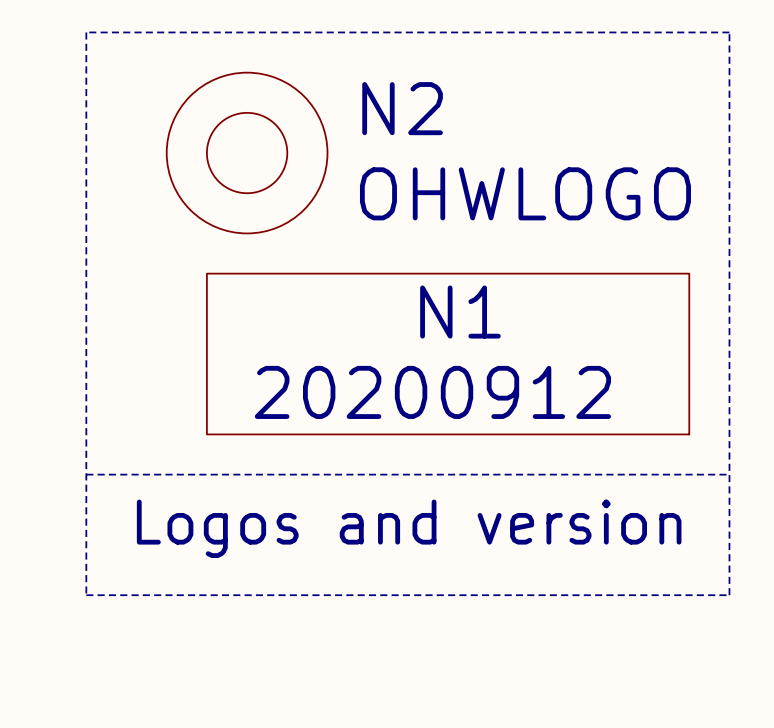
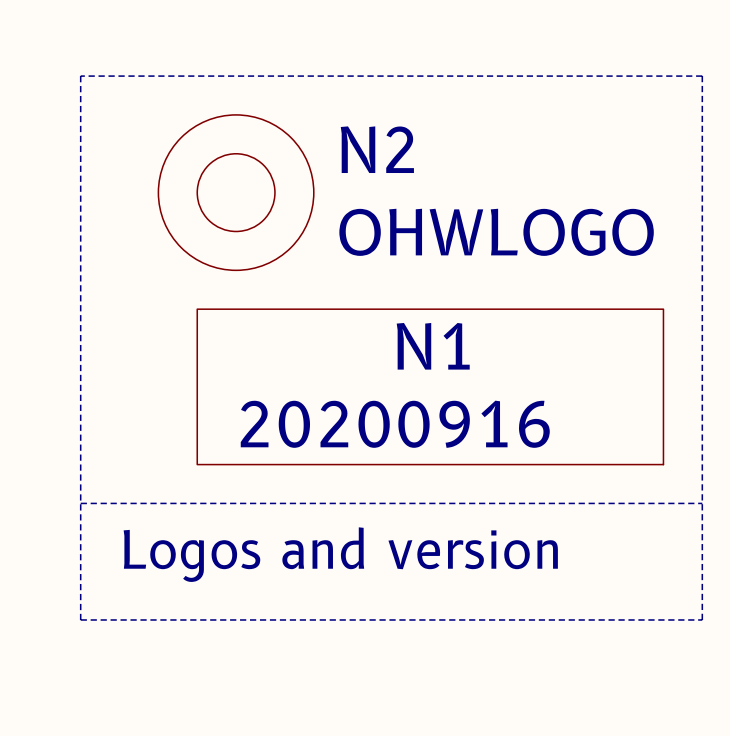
N1 value: 20200912 (432, 392) -> 20200916 (395, 424)

